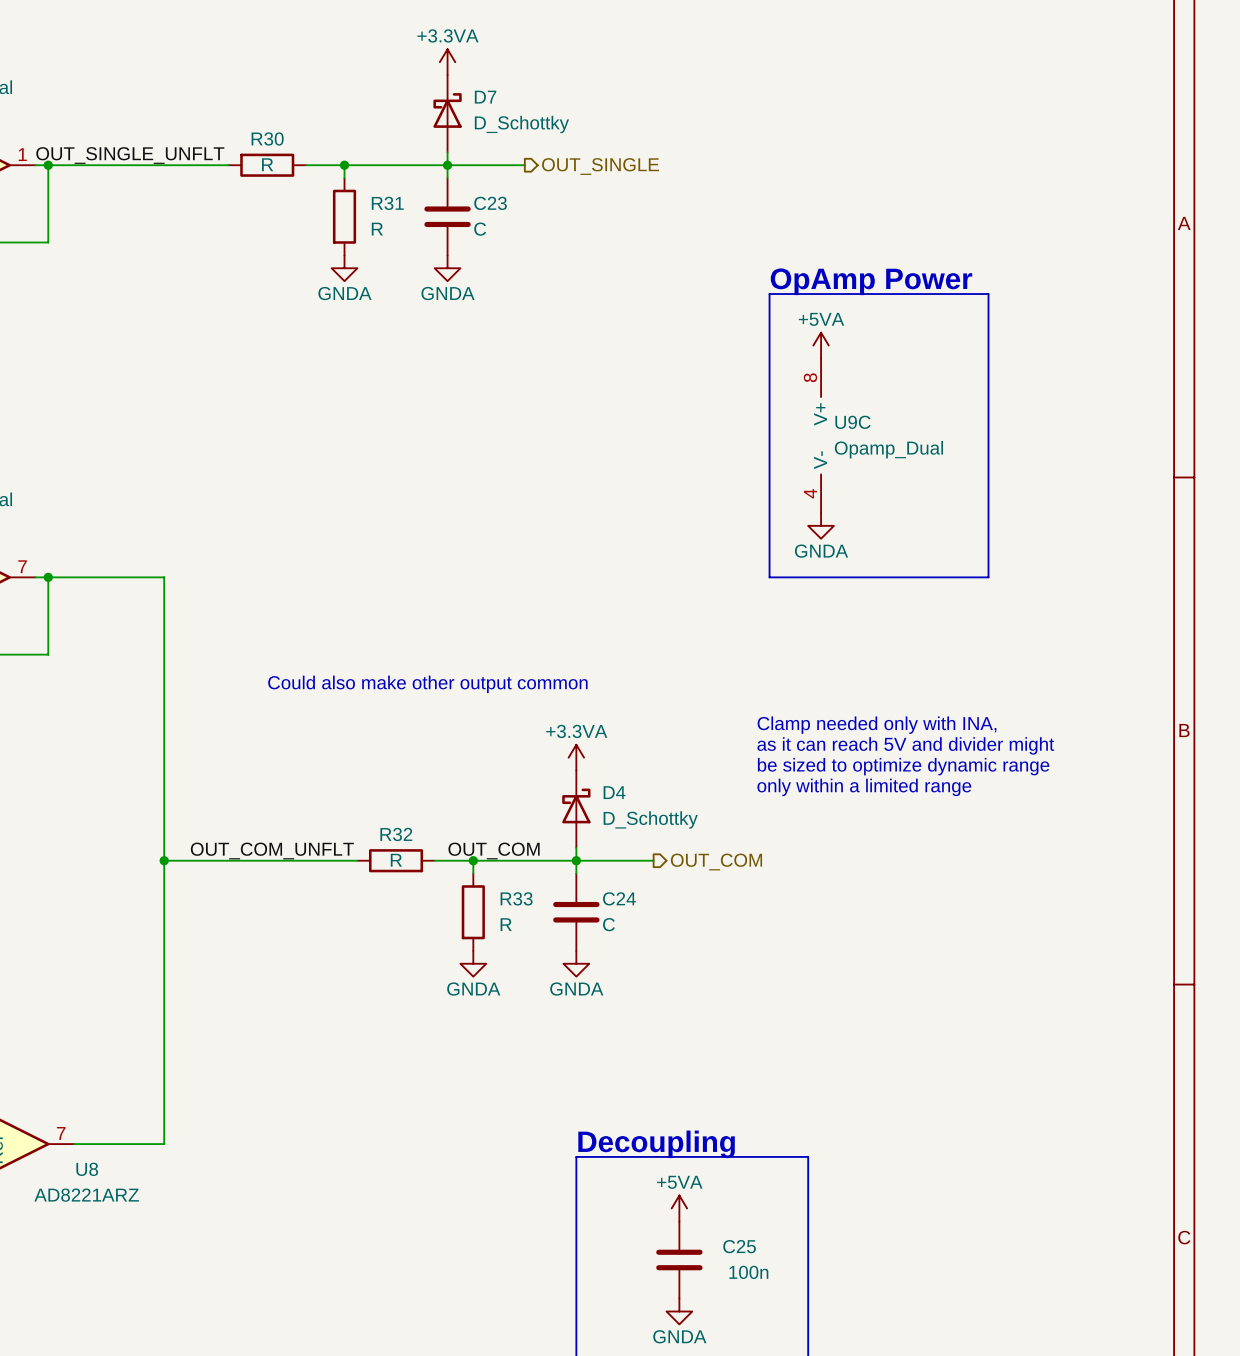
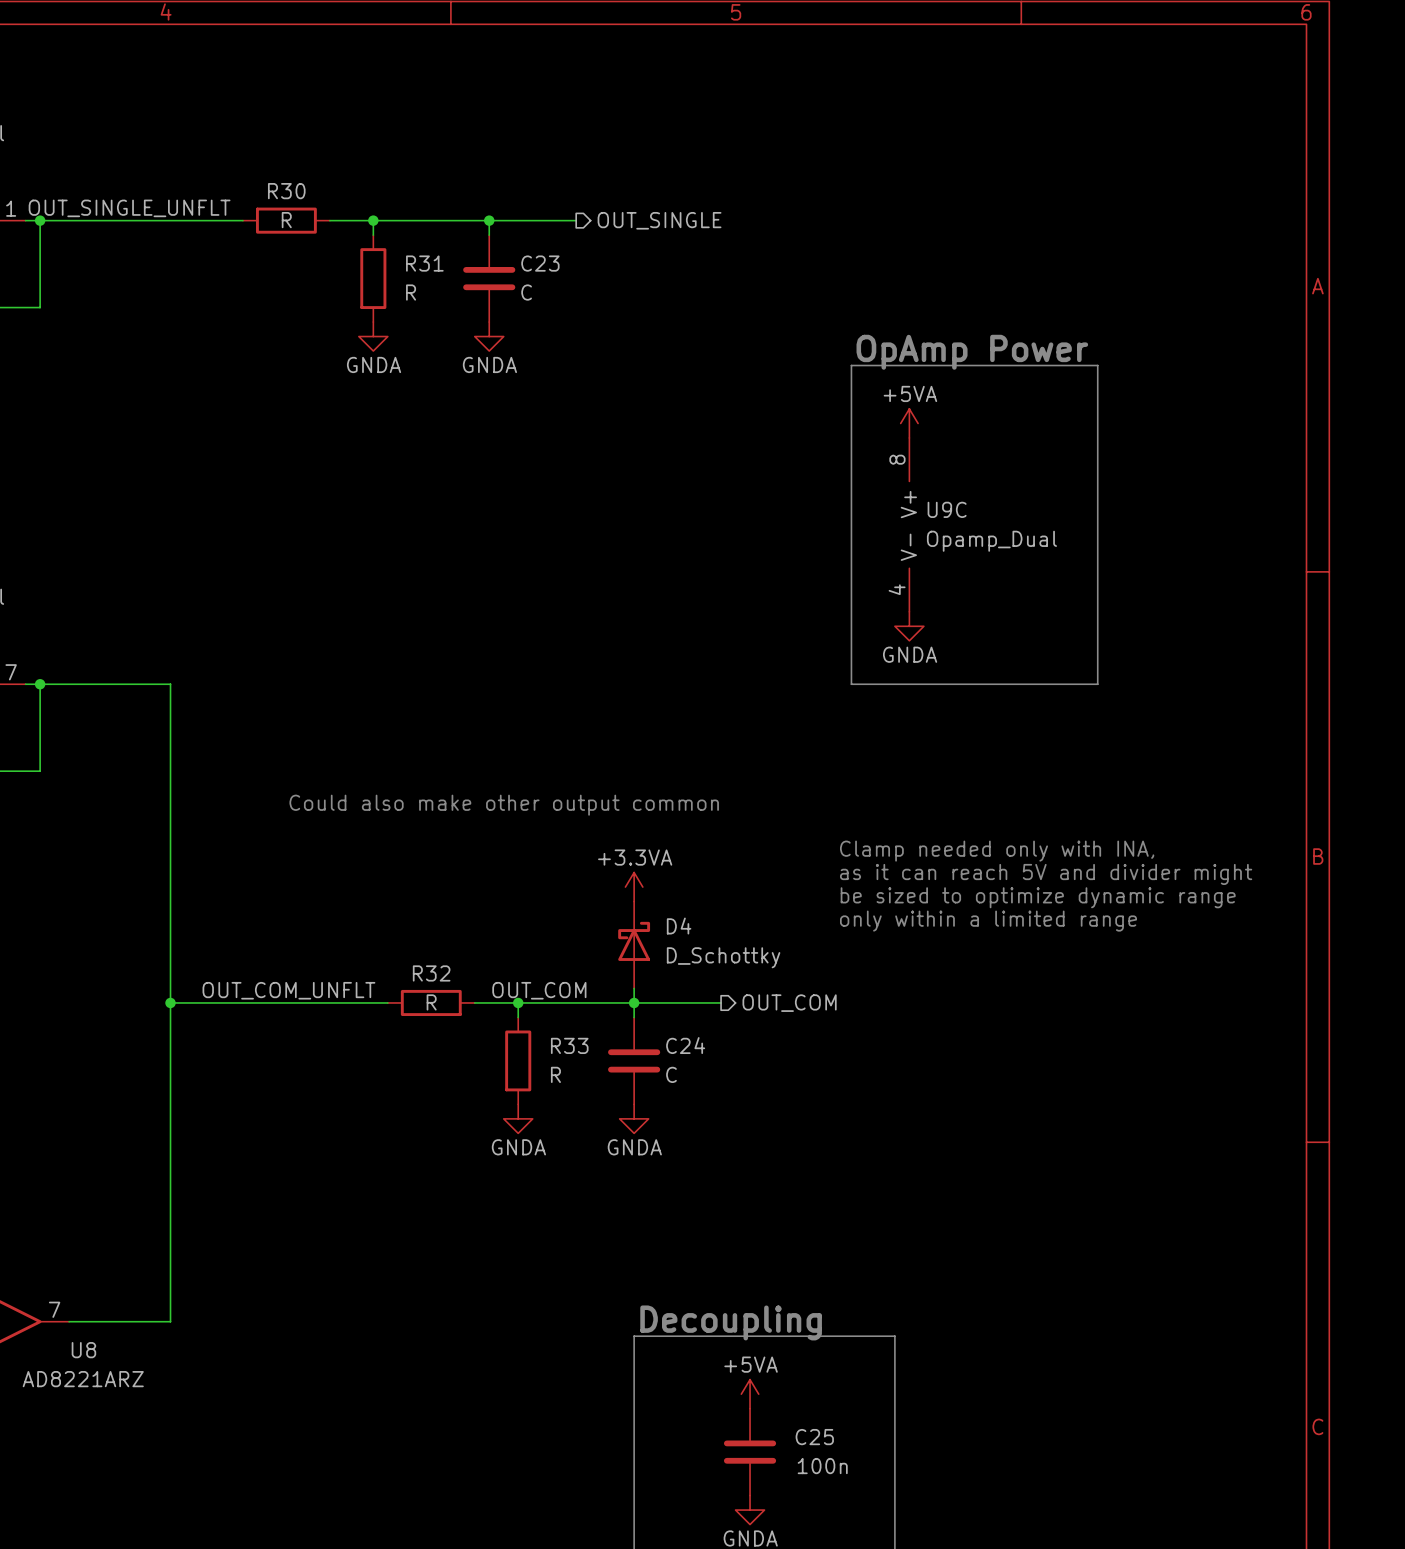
power symbol: +3.3VA (447, 62) -> none
D7: D_Schottky (447, 113) -> none
wire: (447, 152) (447, 165) -> none

